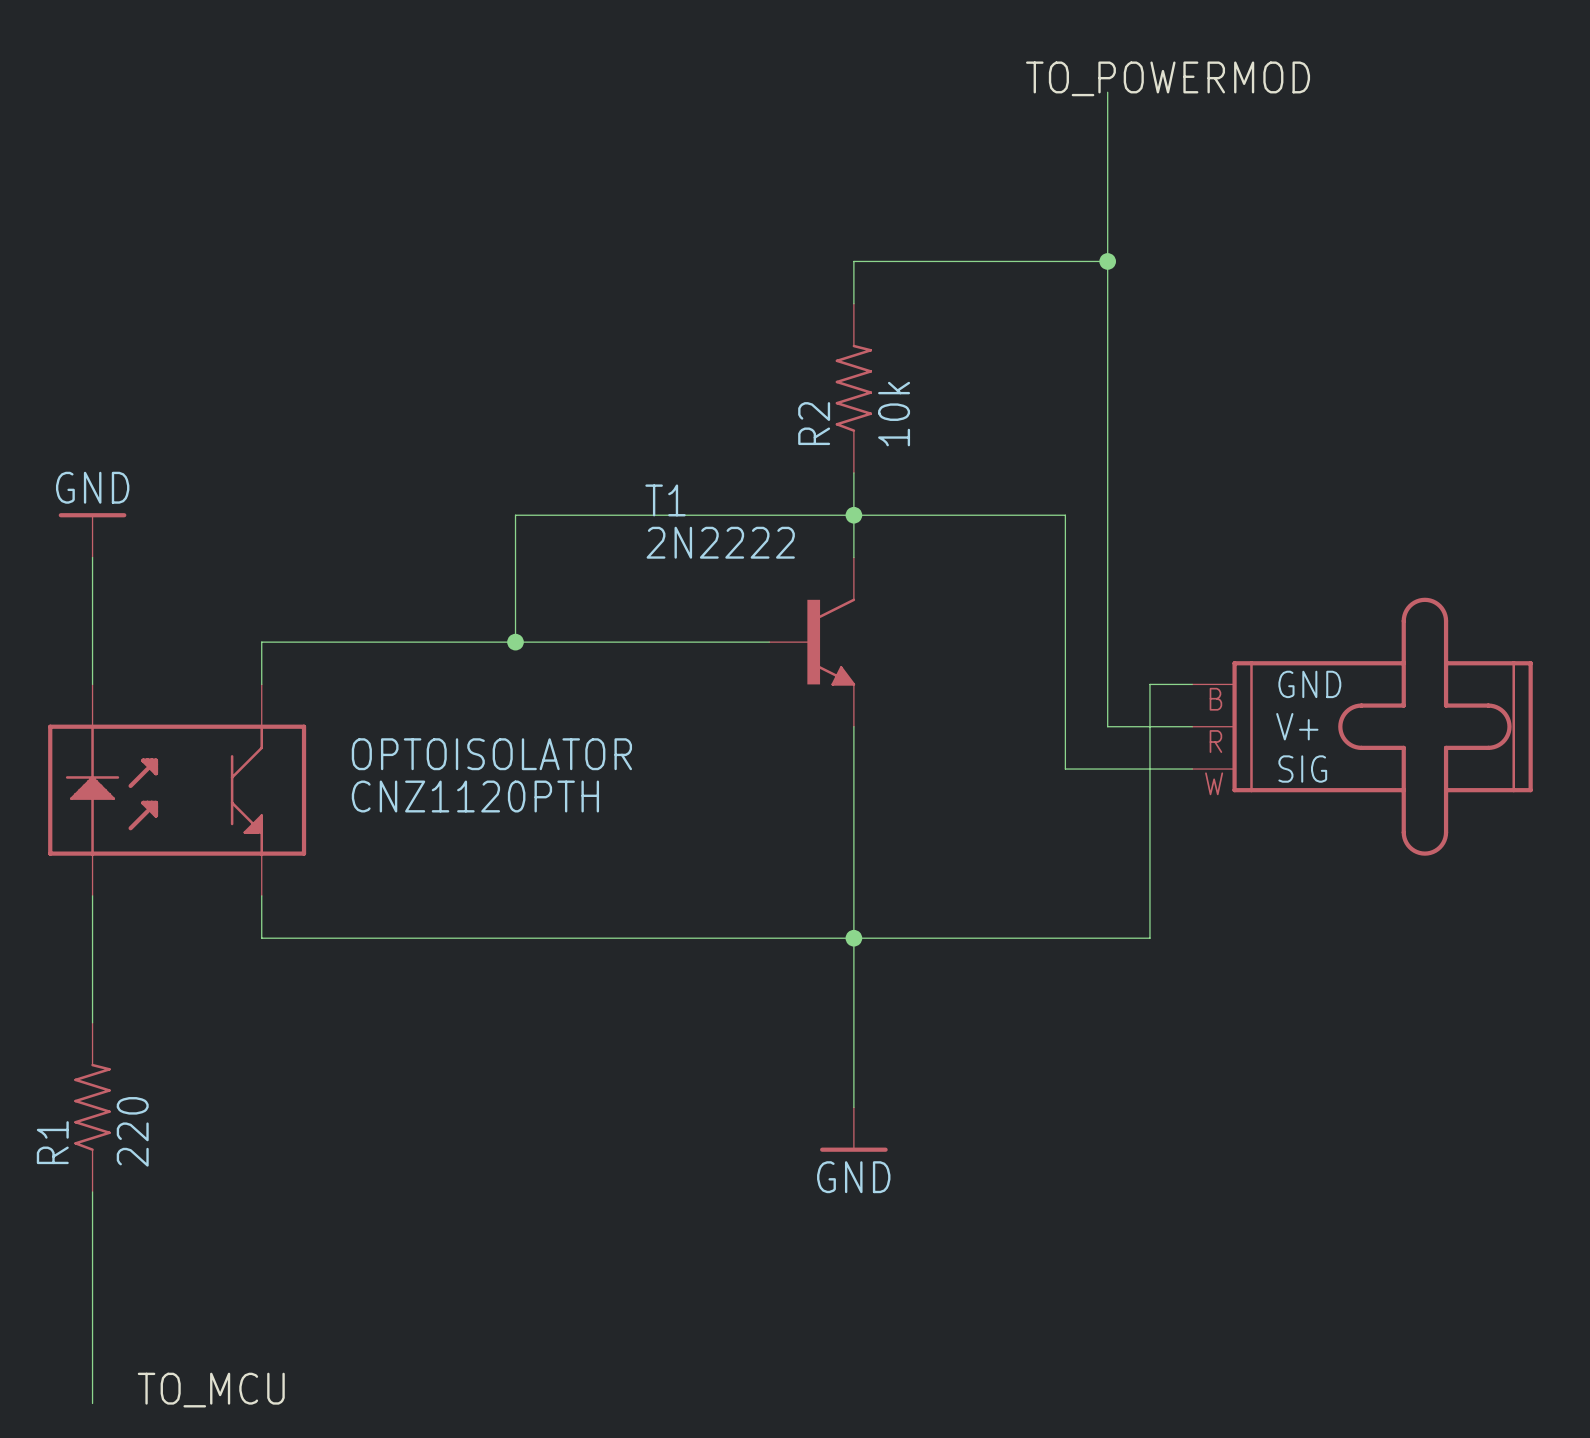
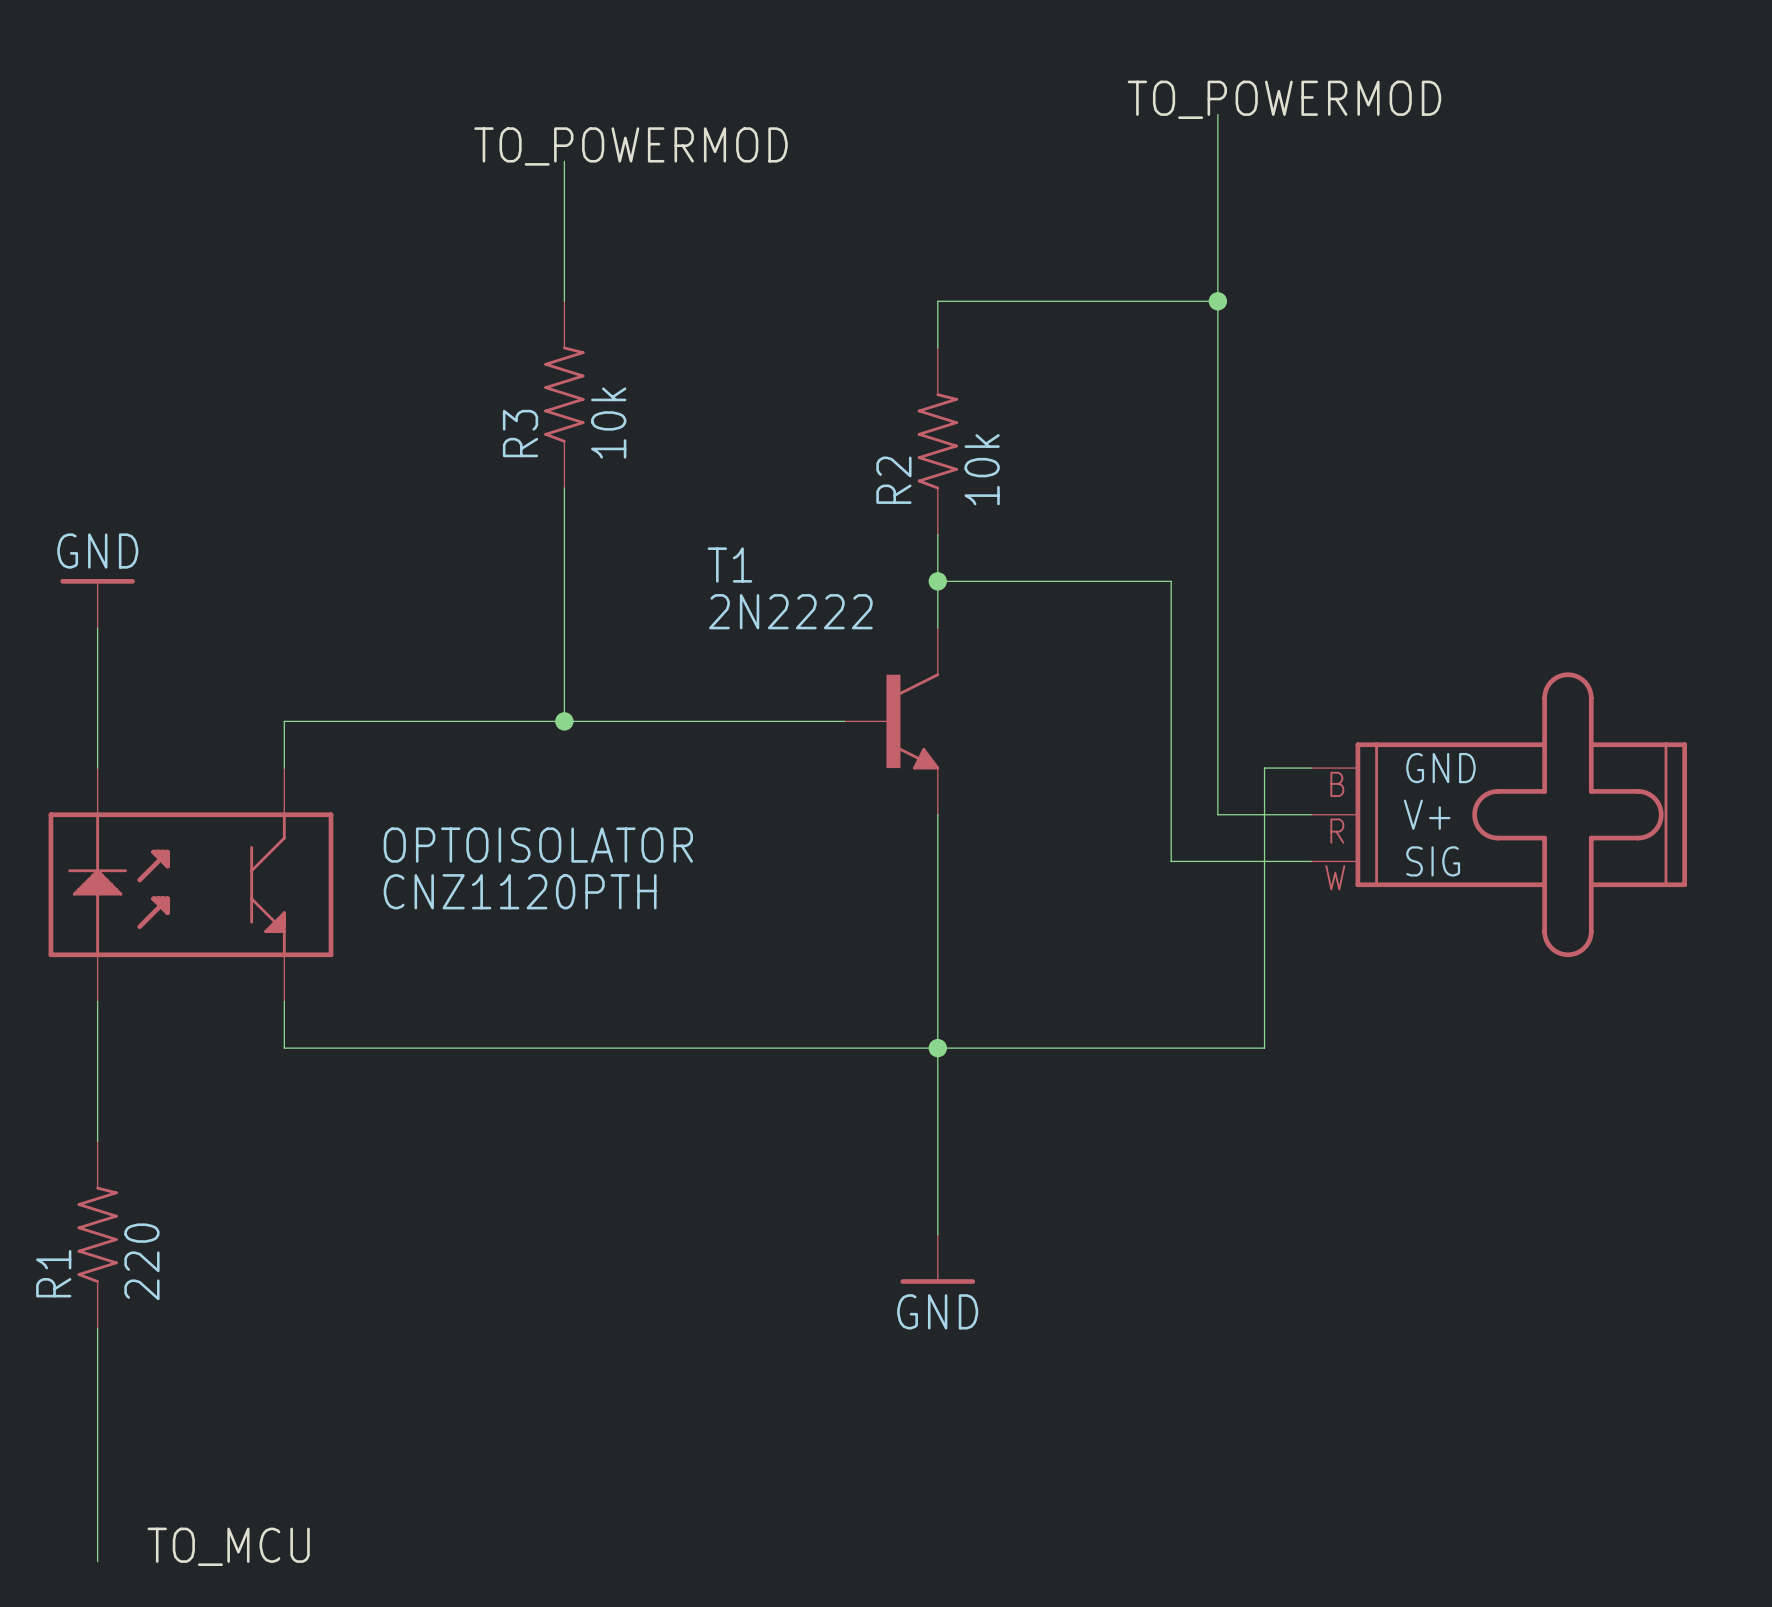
label: none -> TO_POWERMOD (630, 146)
wire: none -> (564, 161) (564, 301)
R3: none -> 10k (564, 394)
wire: (515, 515) (853, 515) -> (564, 581) (564, 488)

